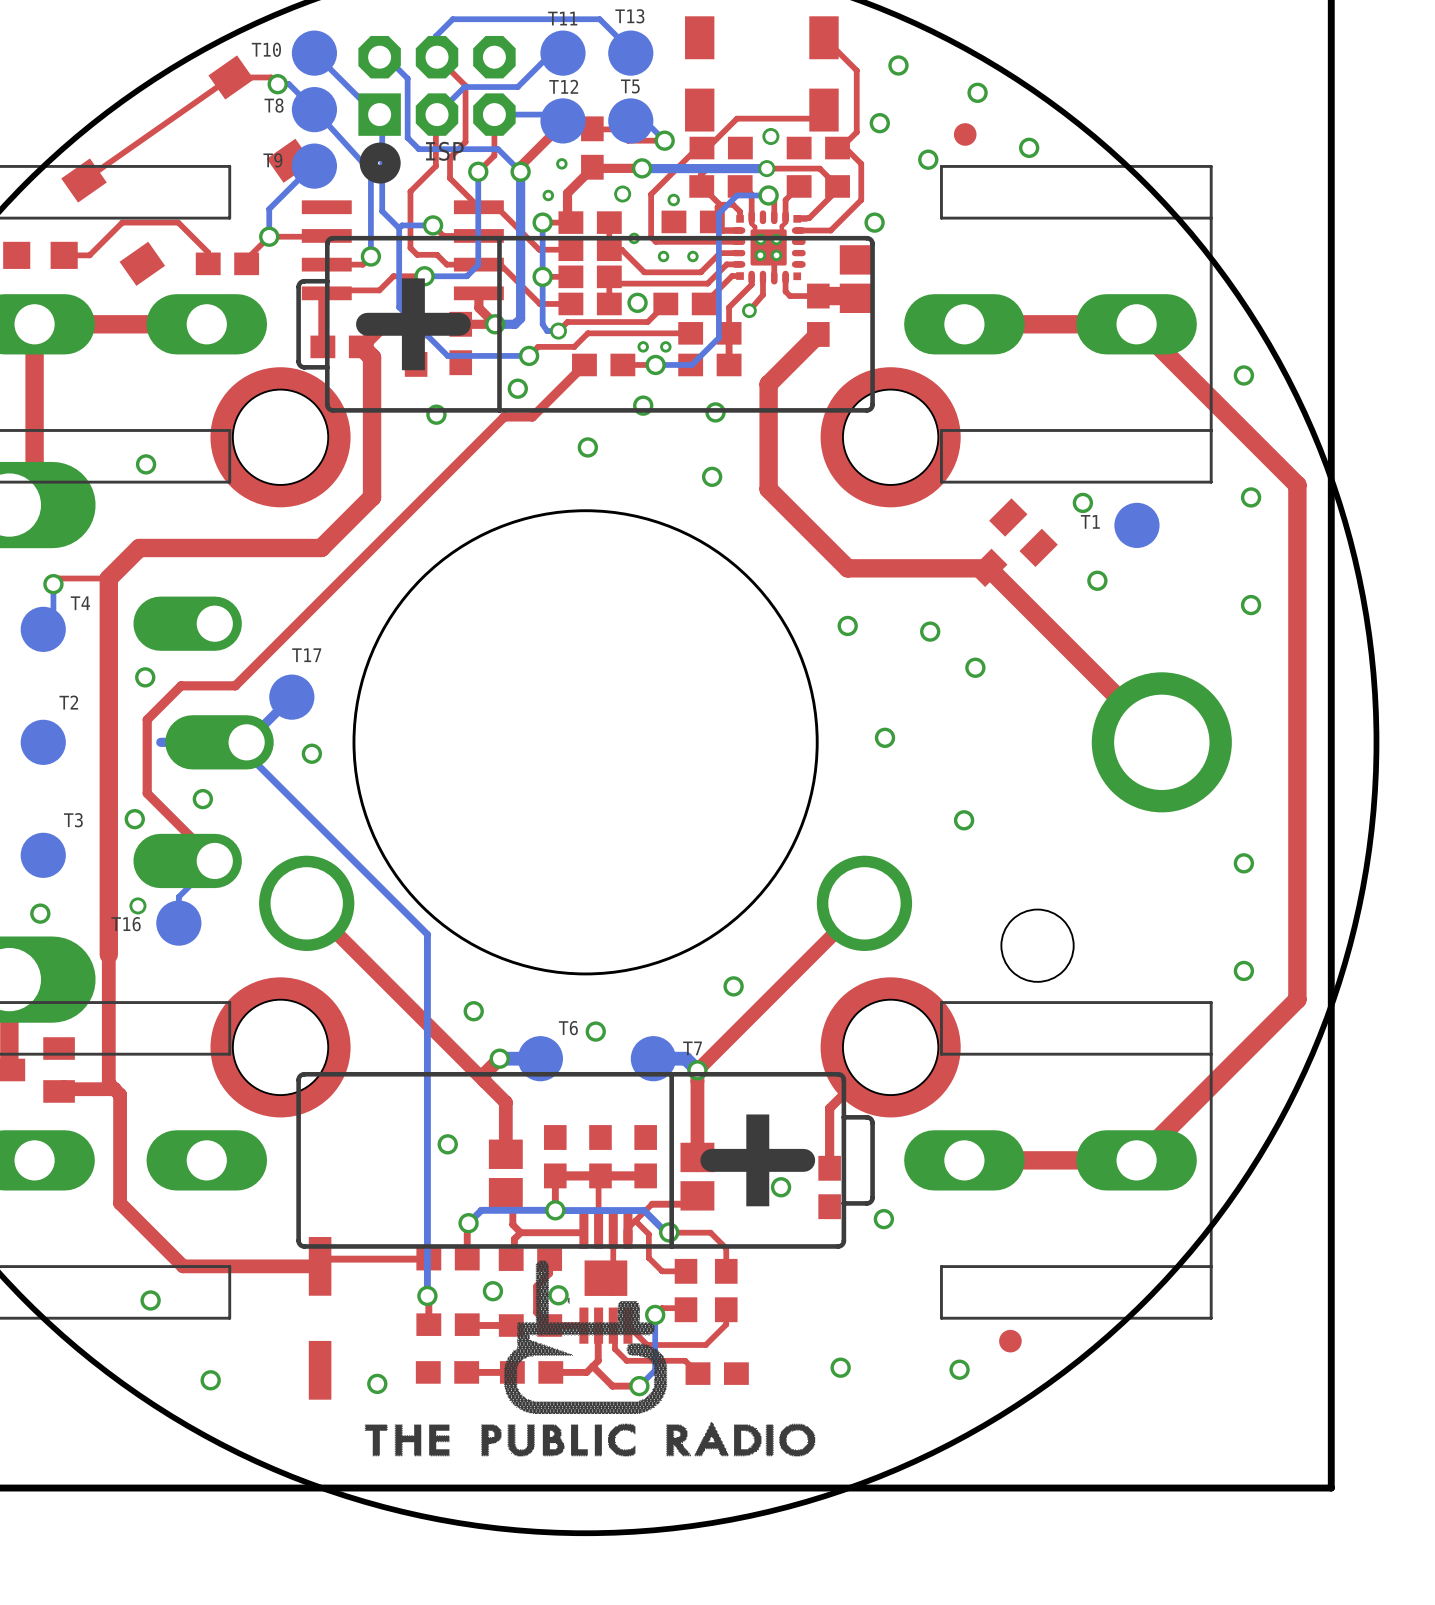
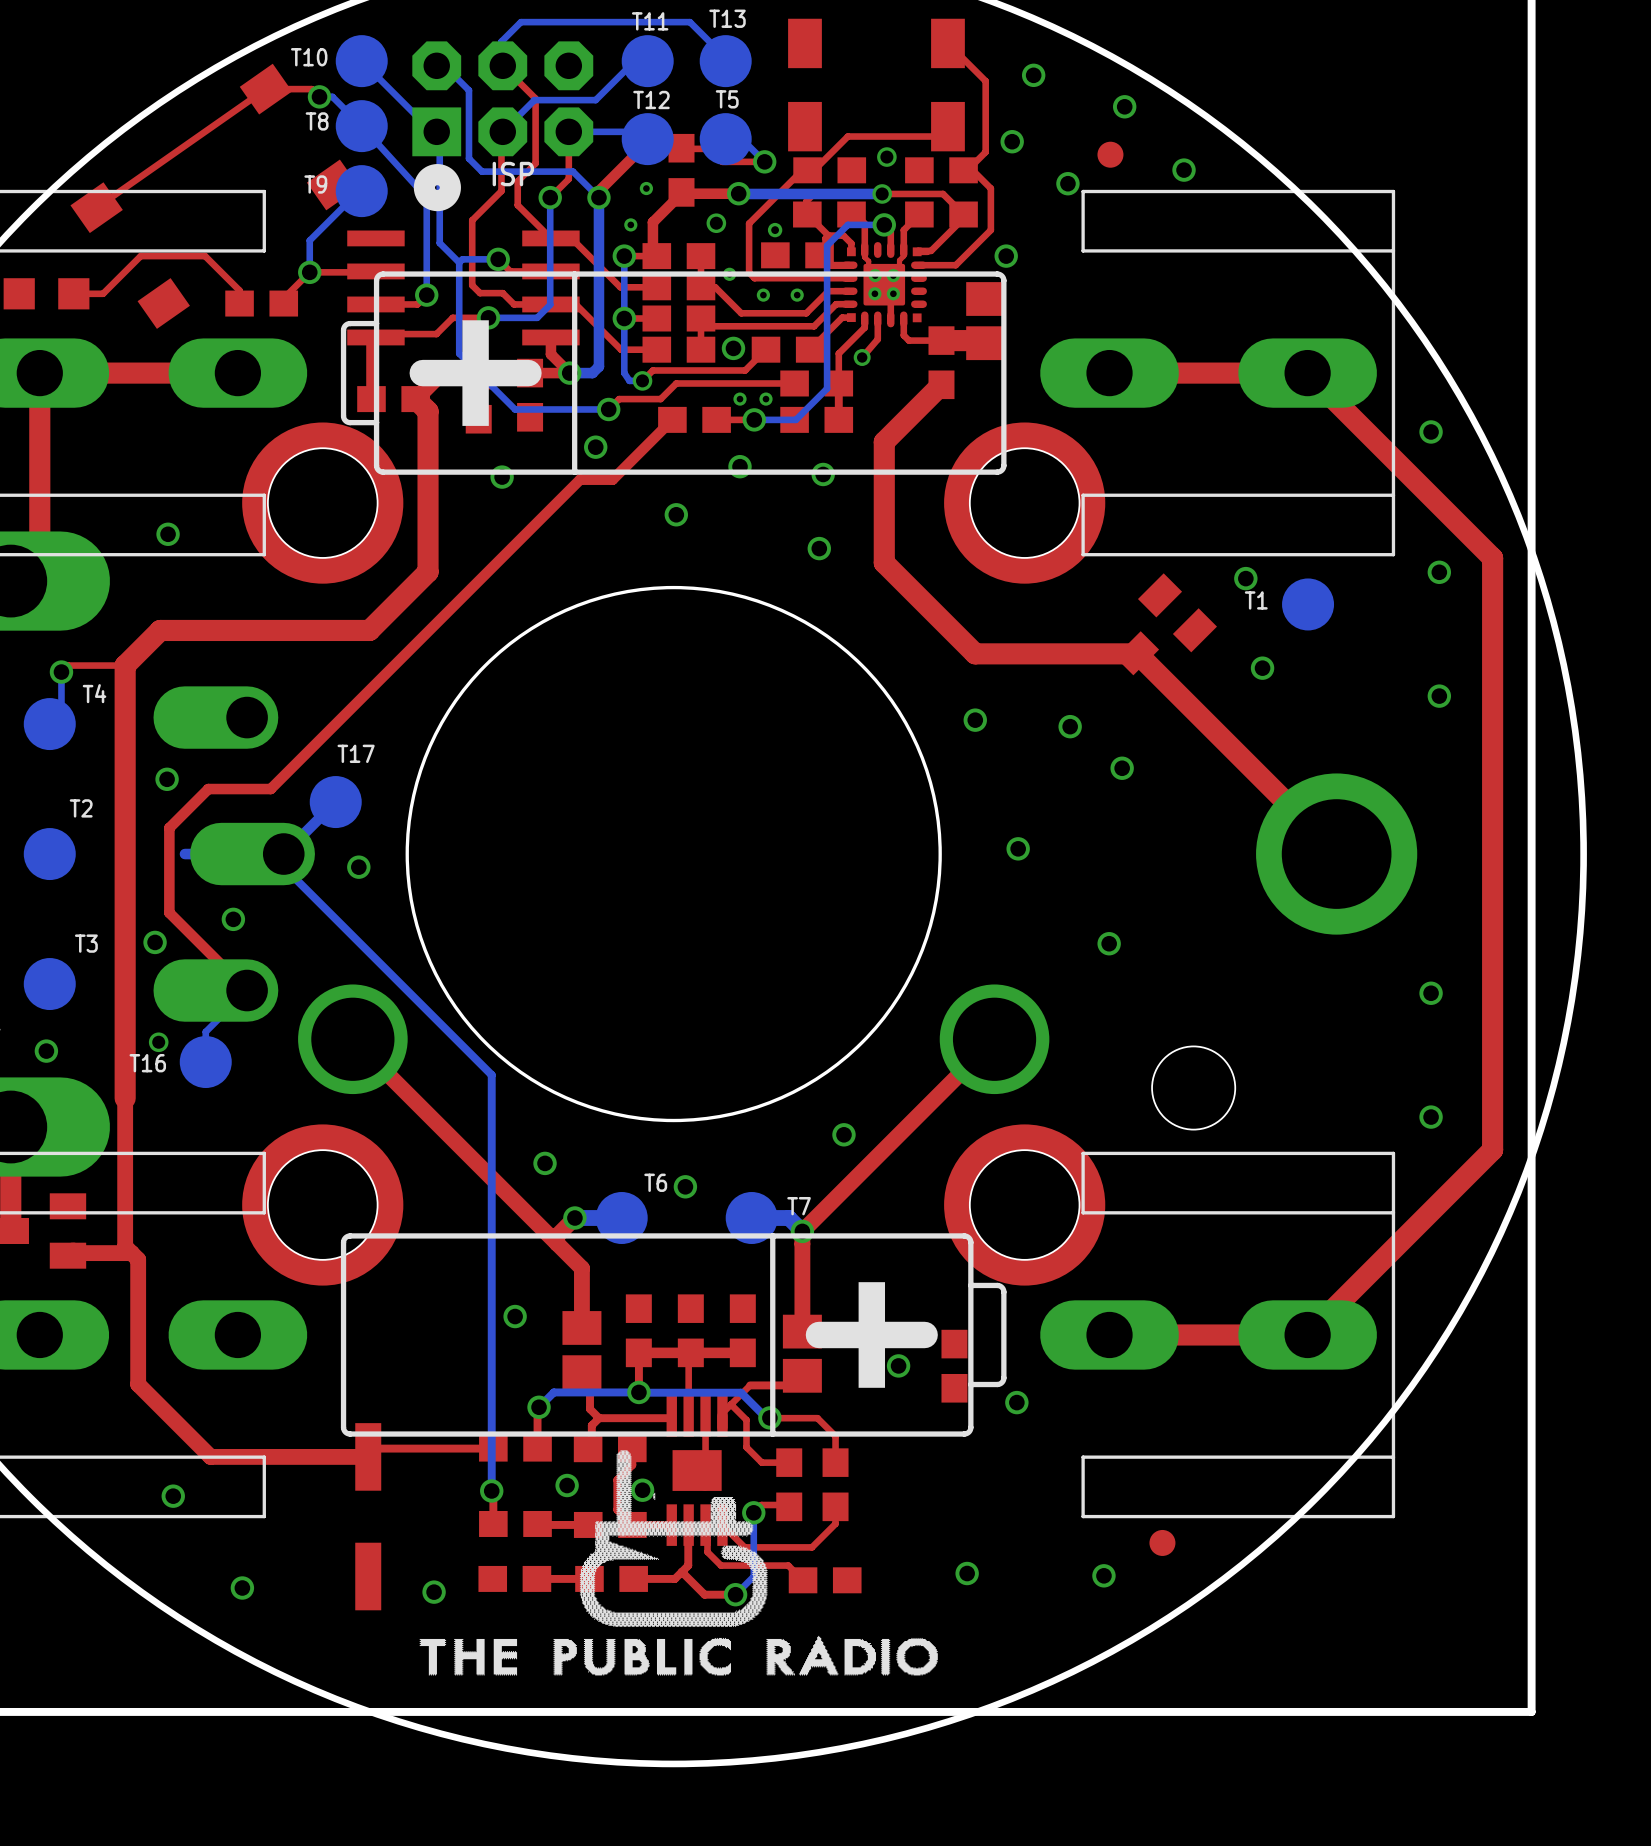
top track: (890, 1047) (829, 1108) (829, 1168) -> none

